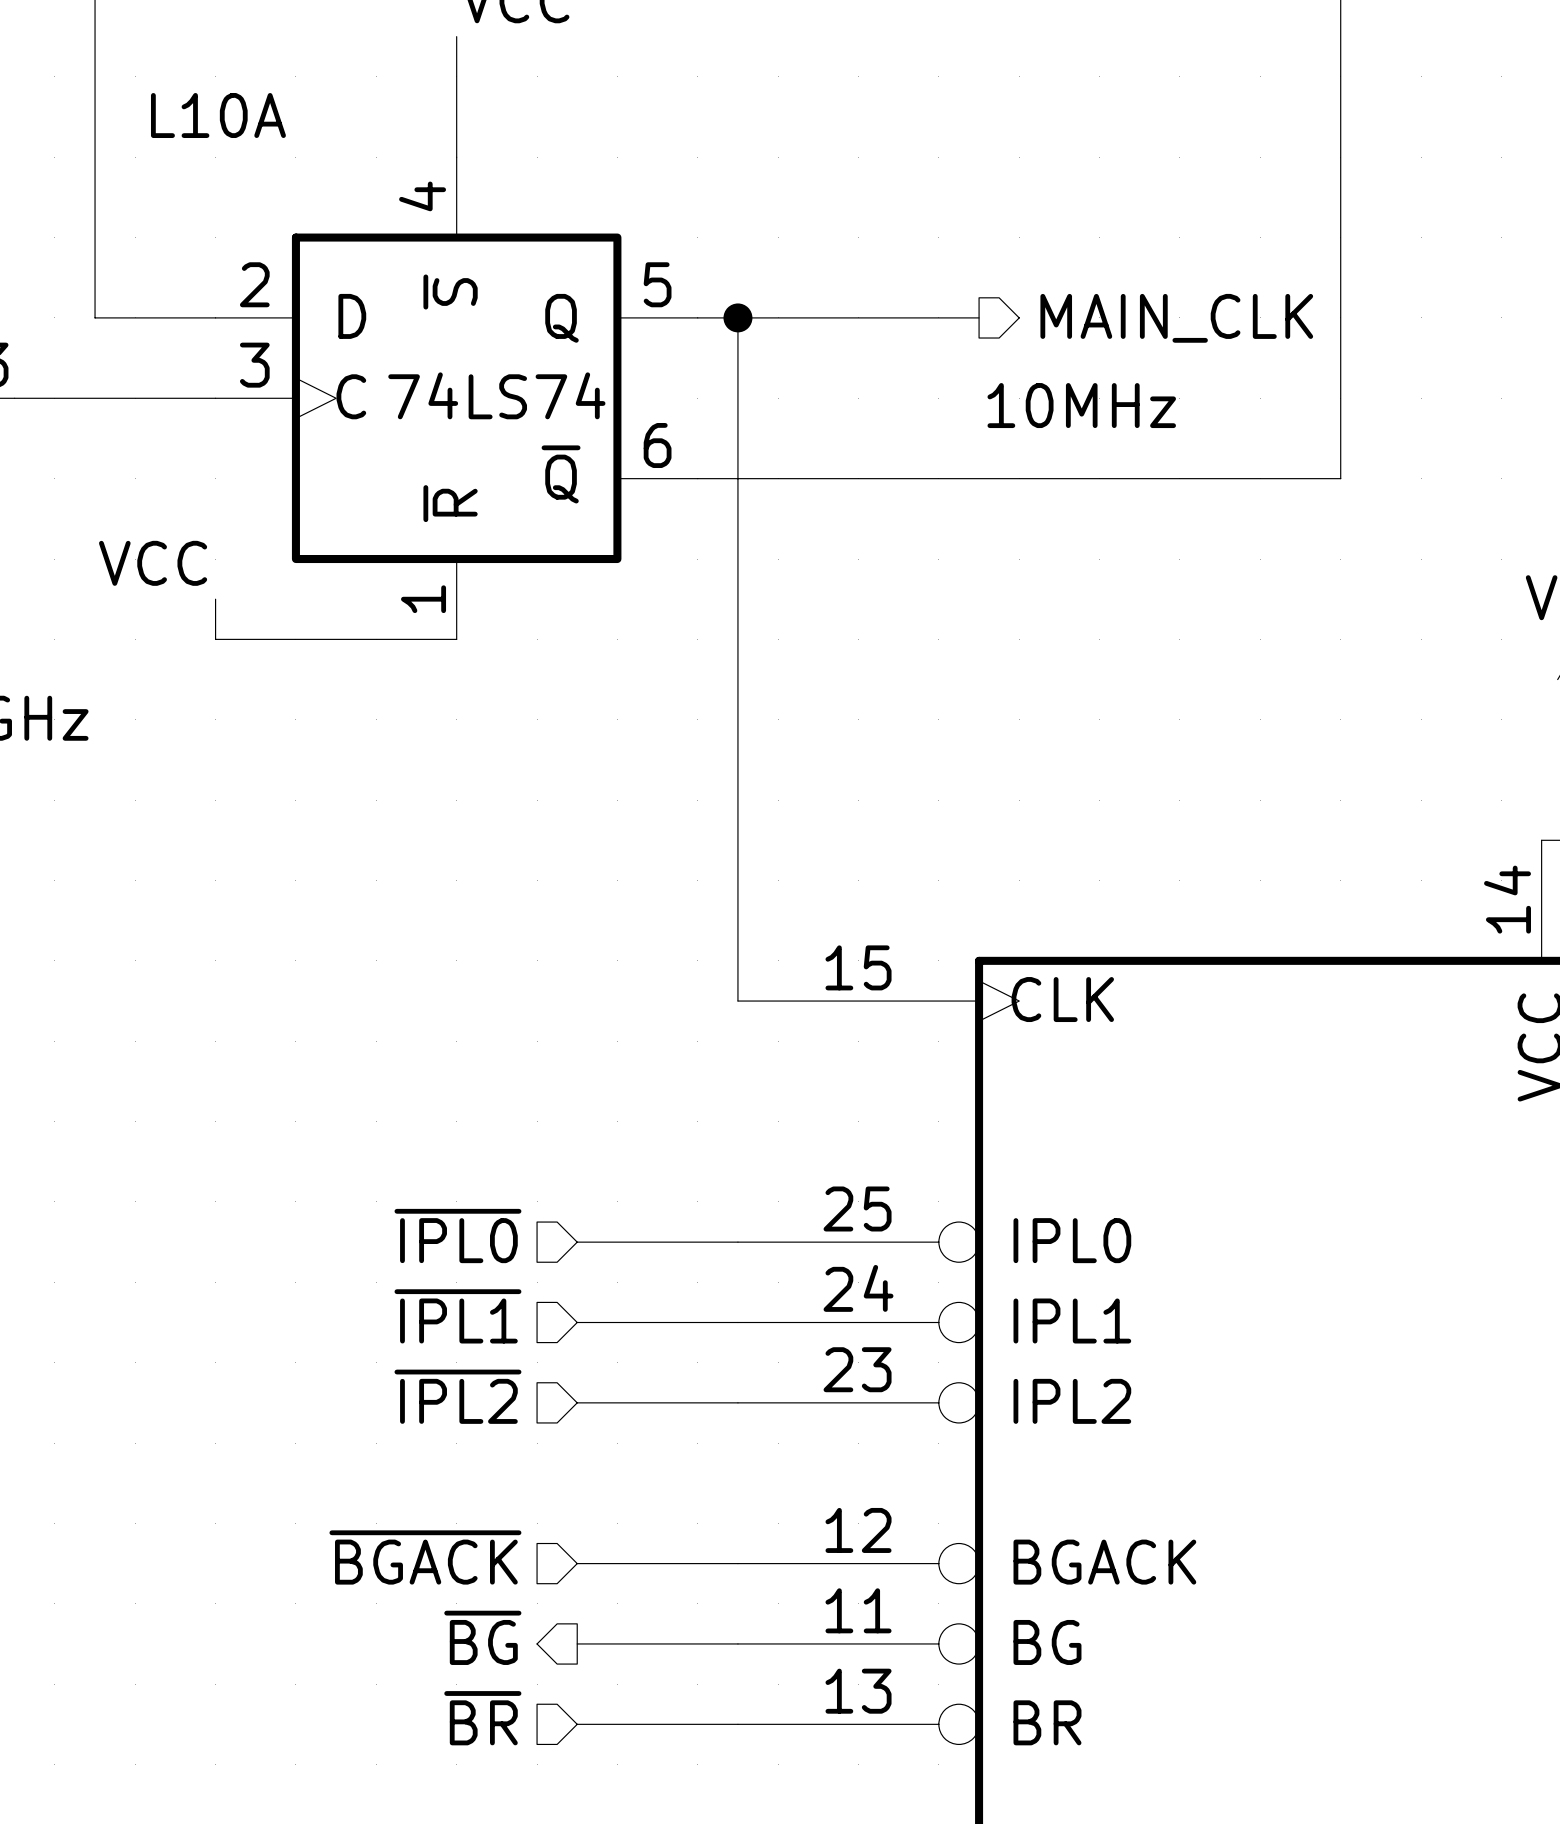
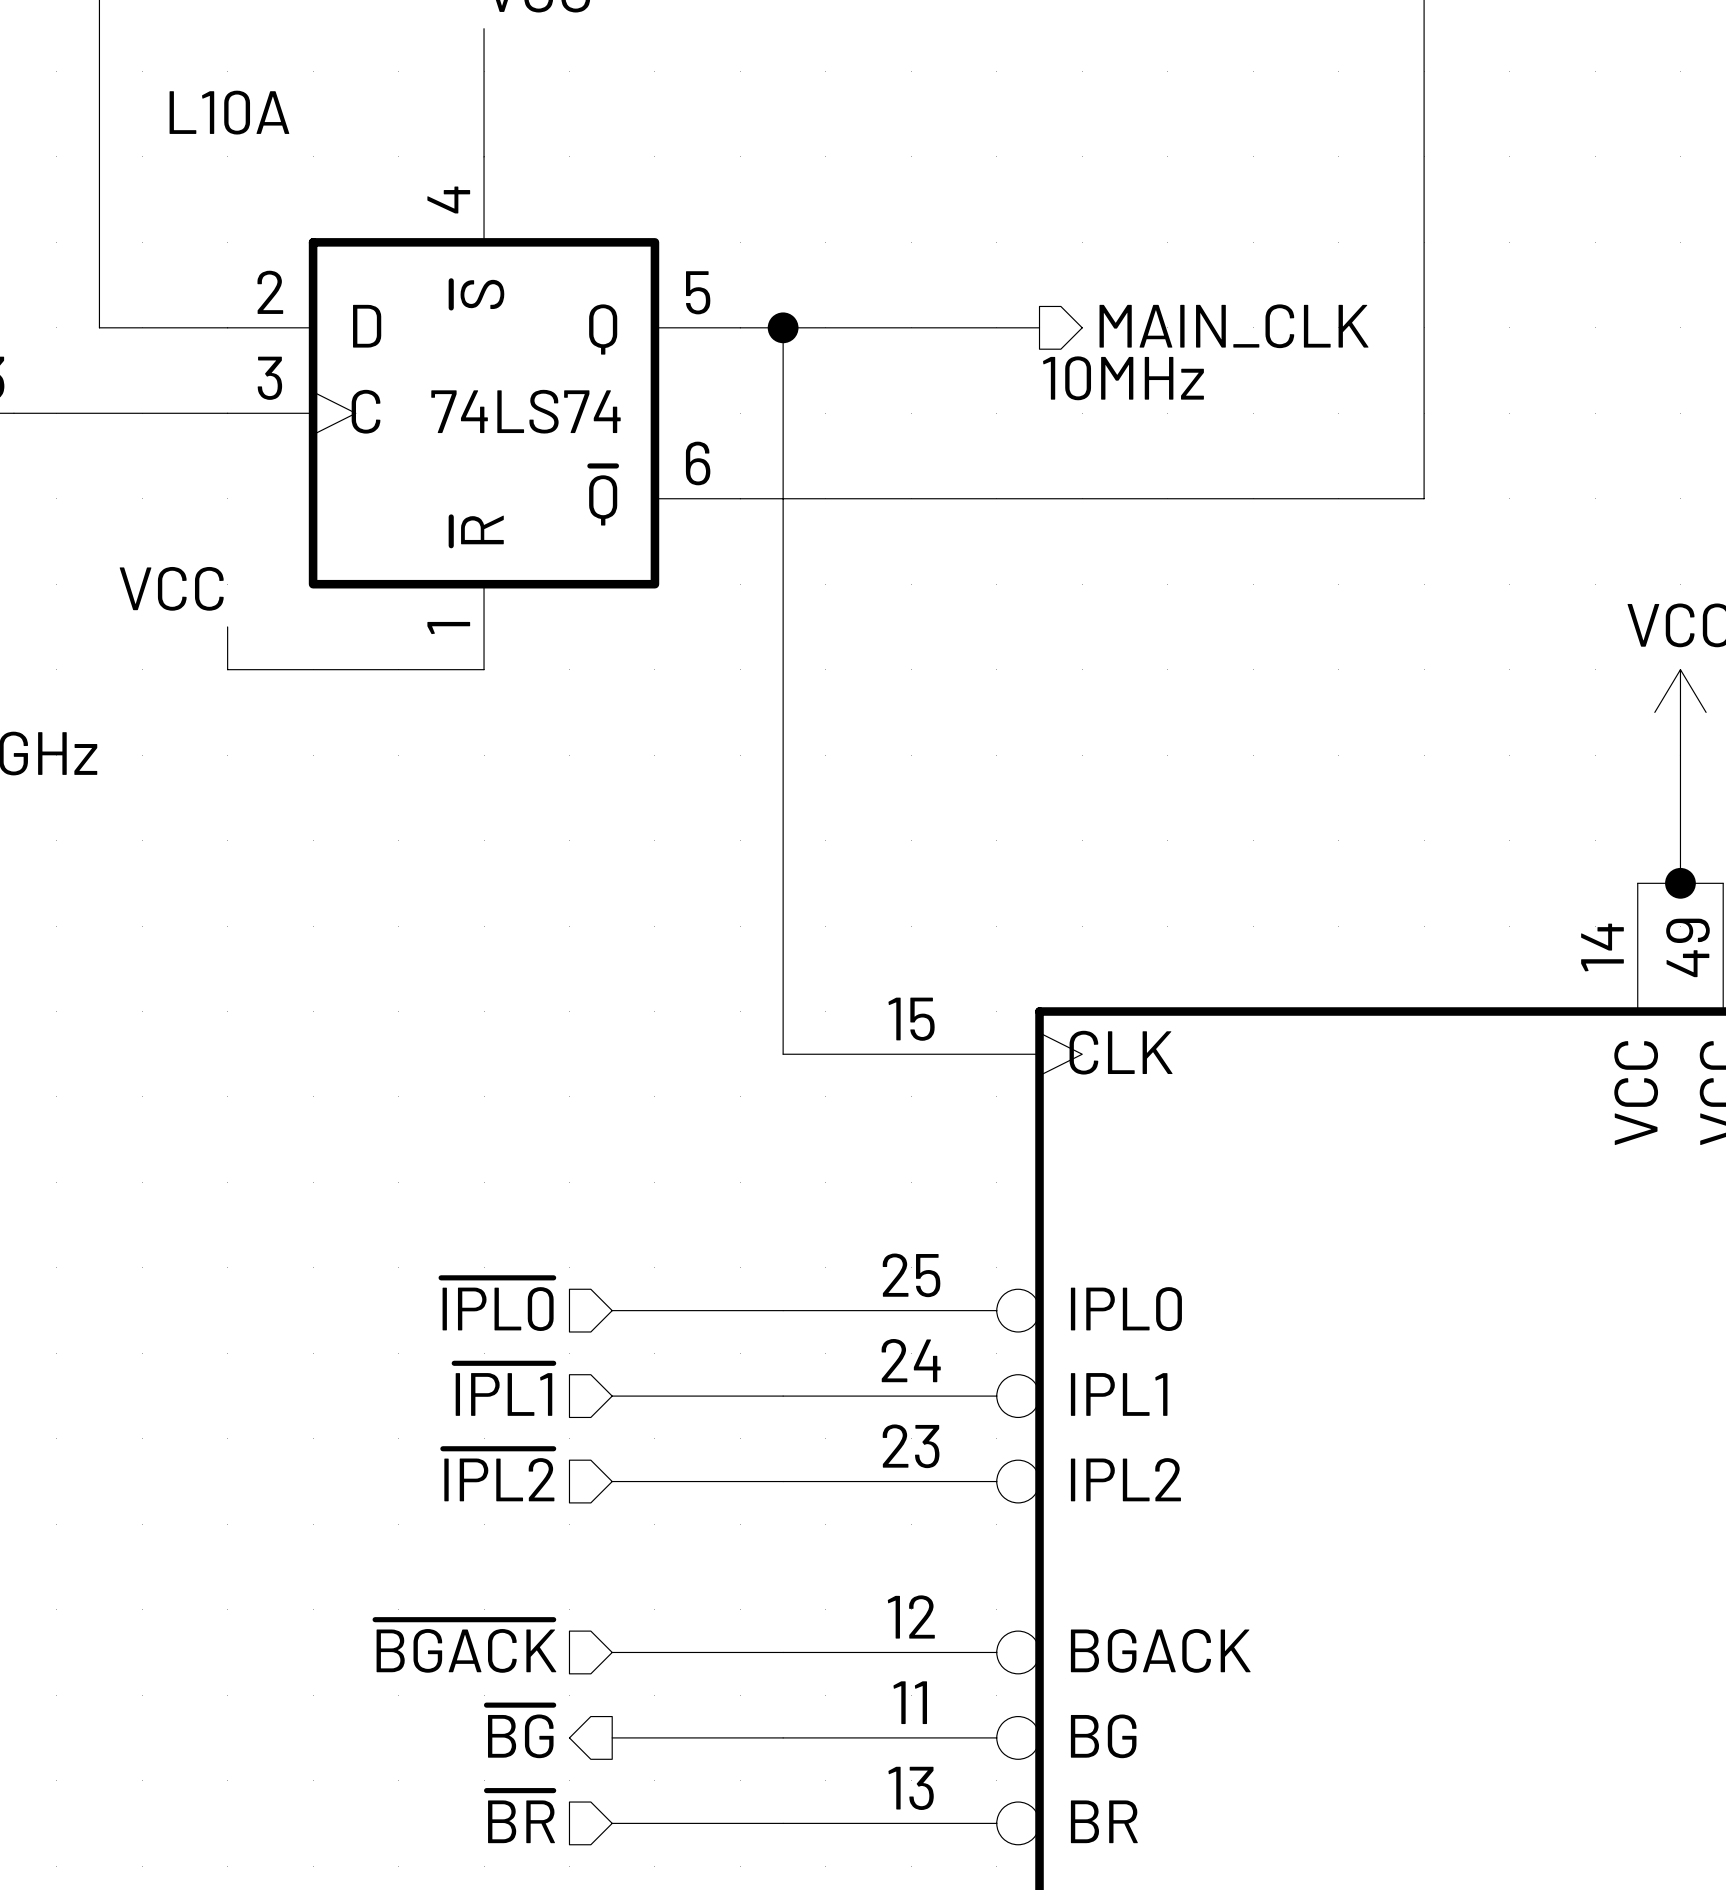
text position: 10MHz (1081, 405) -> 10MHz (1123, 378)

